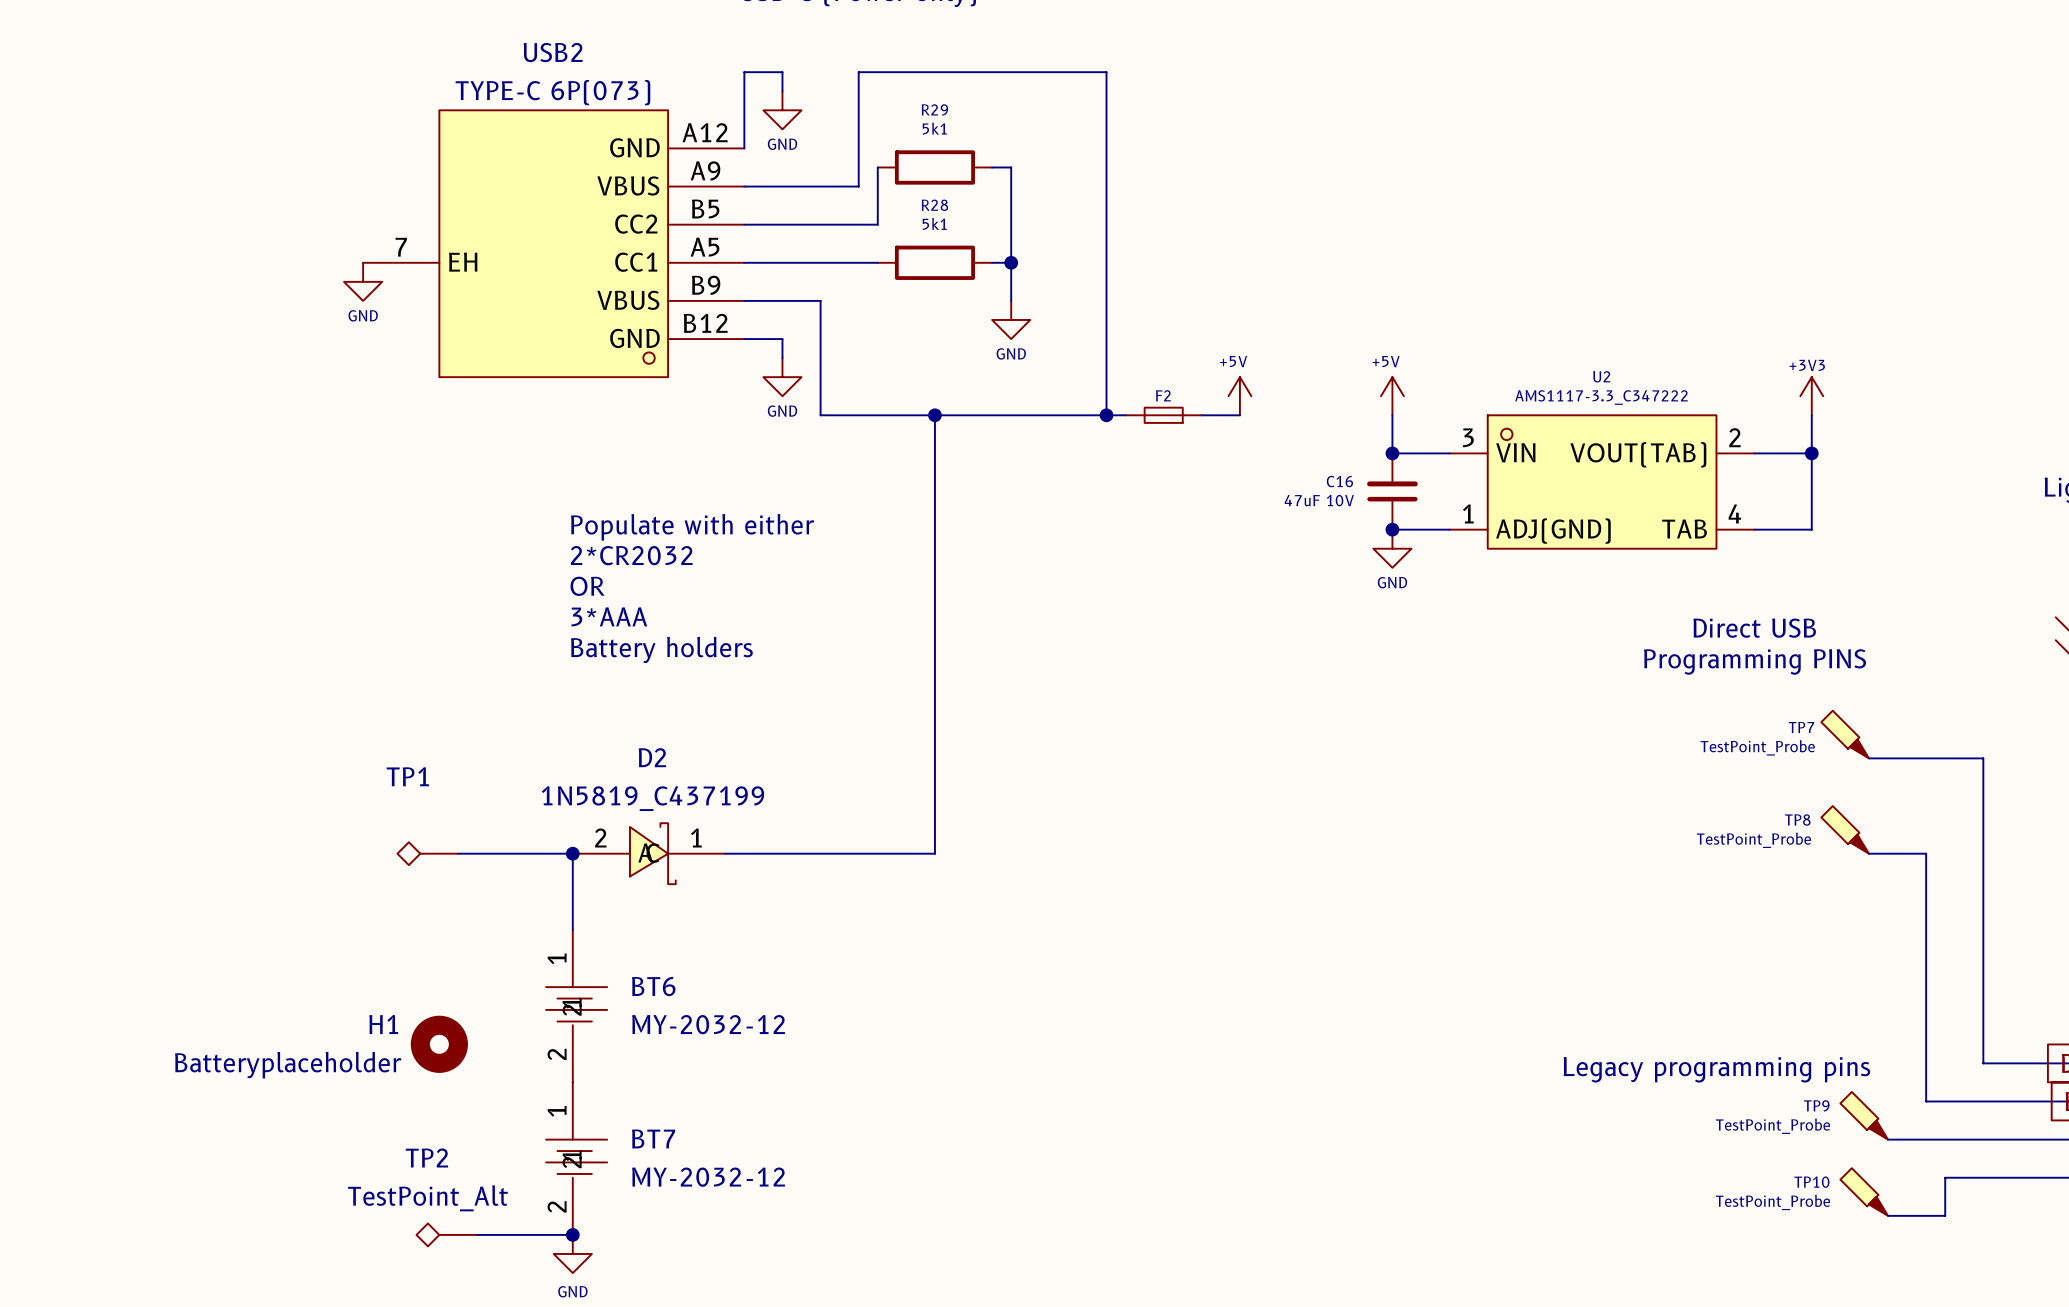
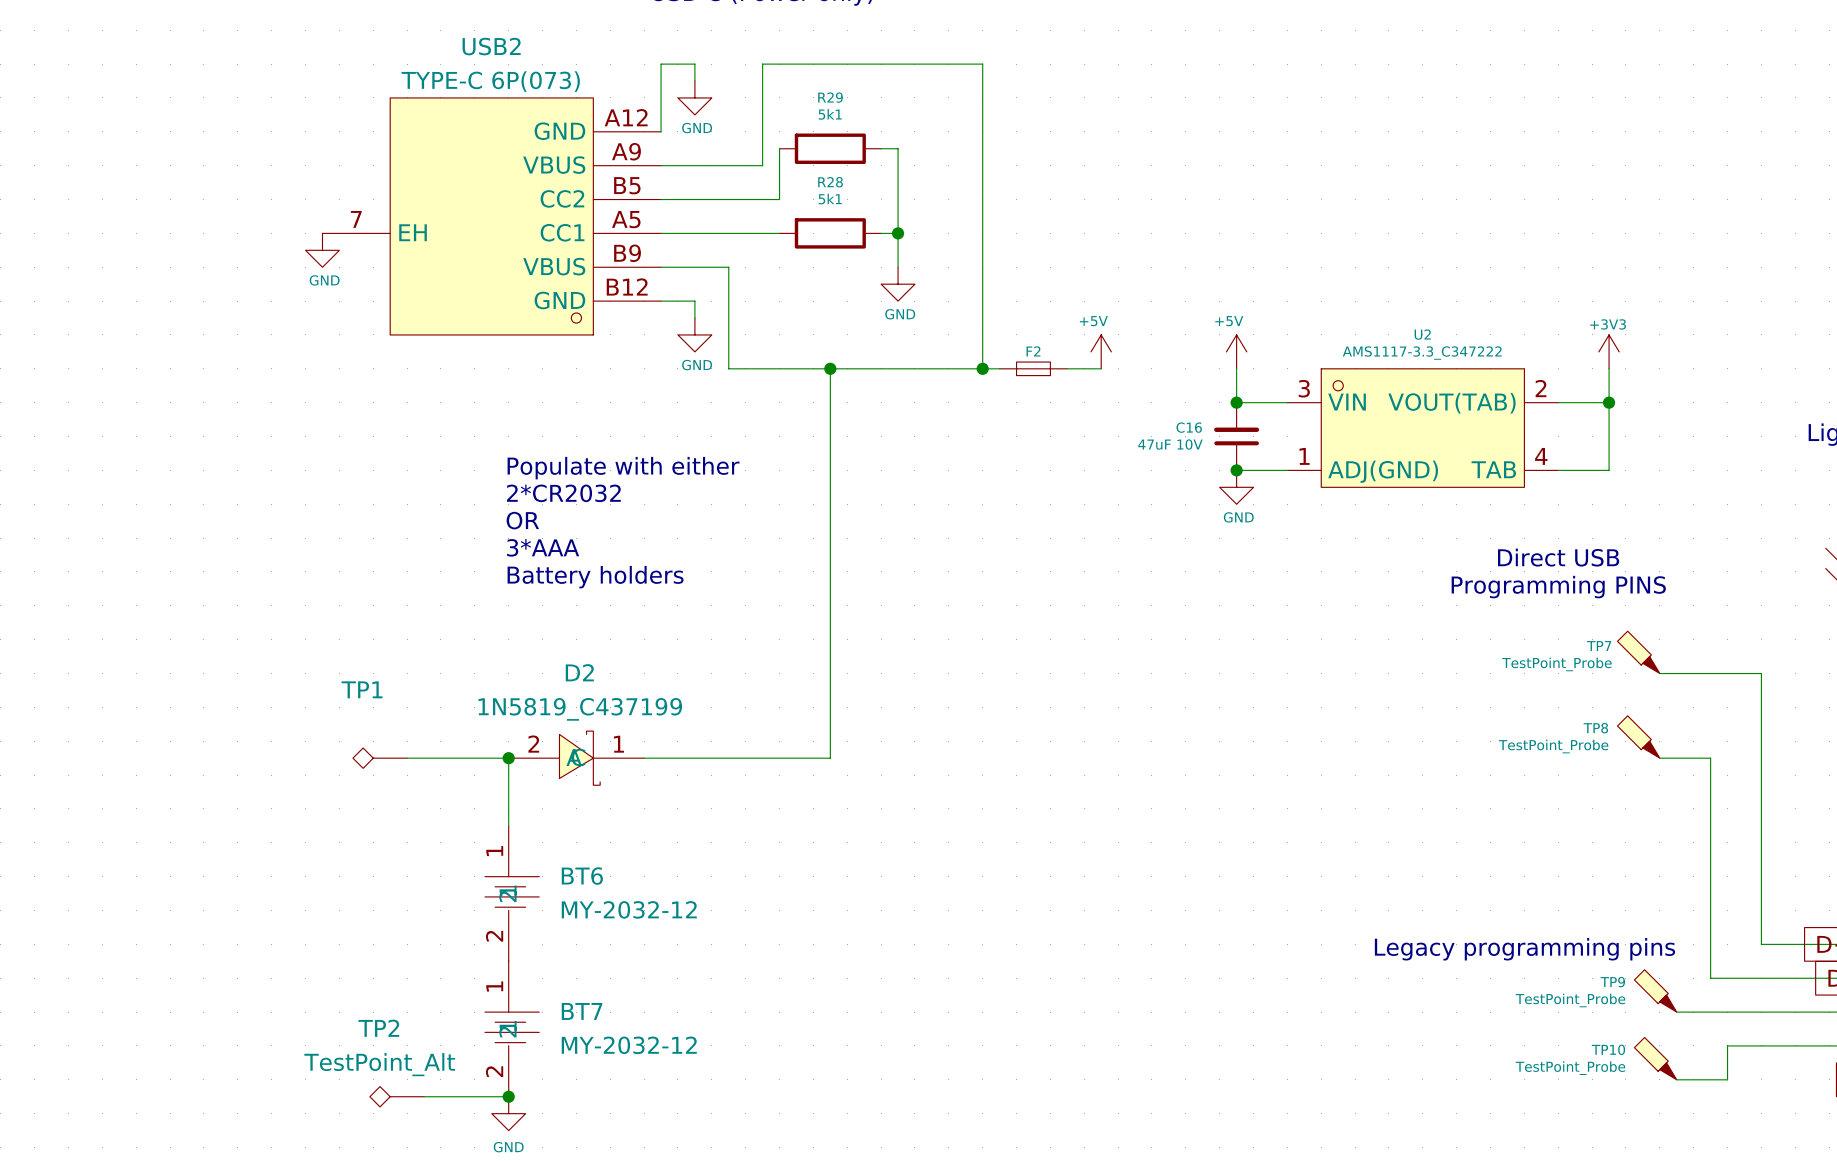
H1: Batteryplaceholder (439, 1044) -> none

